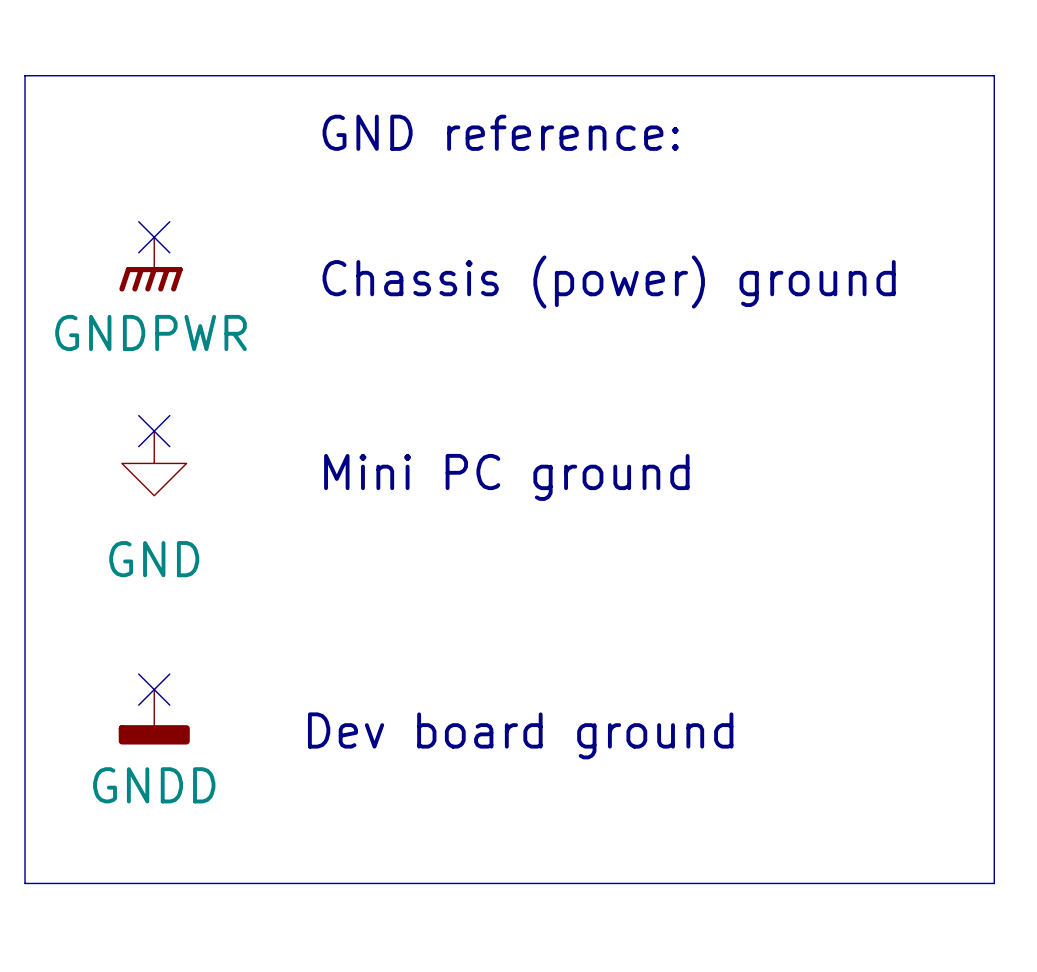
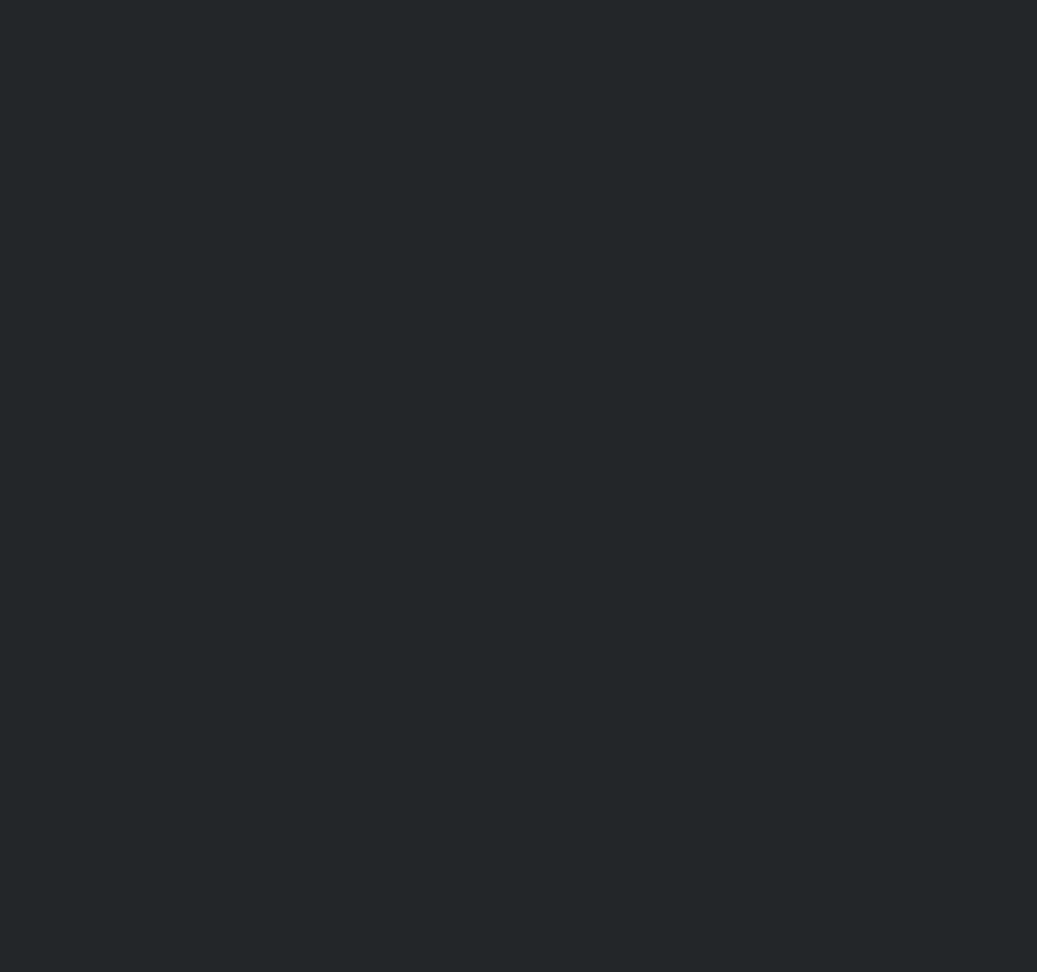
line: (25, 75) (994, 75) (994, 883) (25, 883) (25, 75) -> none
text: GND reference: (500, 132) -> none
no-connect mark: (154, 237) -> none
power symbol: GNDPWR (151, 264) -> none
text: Chassis (power) ground (609, 282) -> none
no-connect mark: (154, 431) -> none
power symbol: GND (154, 463) -> none
text: Mini PC ground (506, 477) -> none
no-connect mark: (154, 689) -> none
power symbol: GNDD (154, 717) -> none
text: Dev board ground (520, 735) -> none

